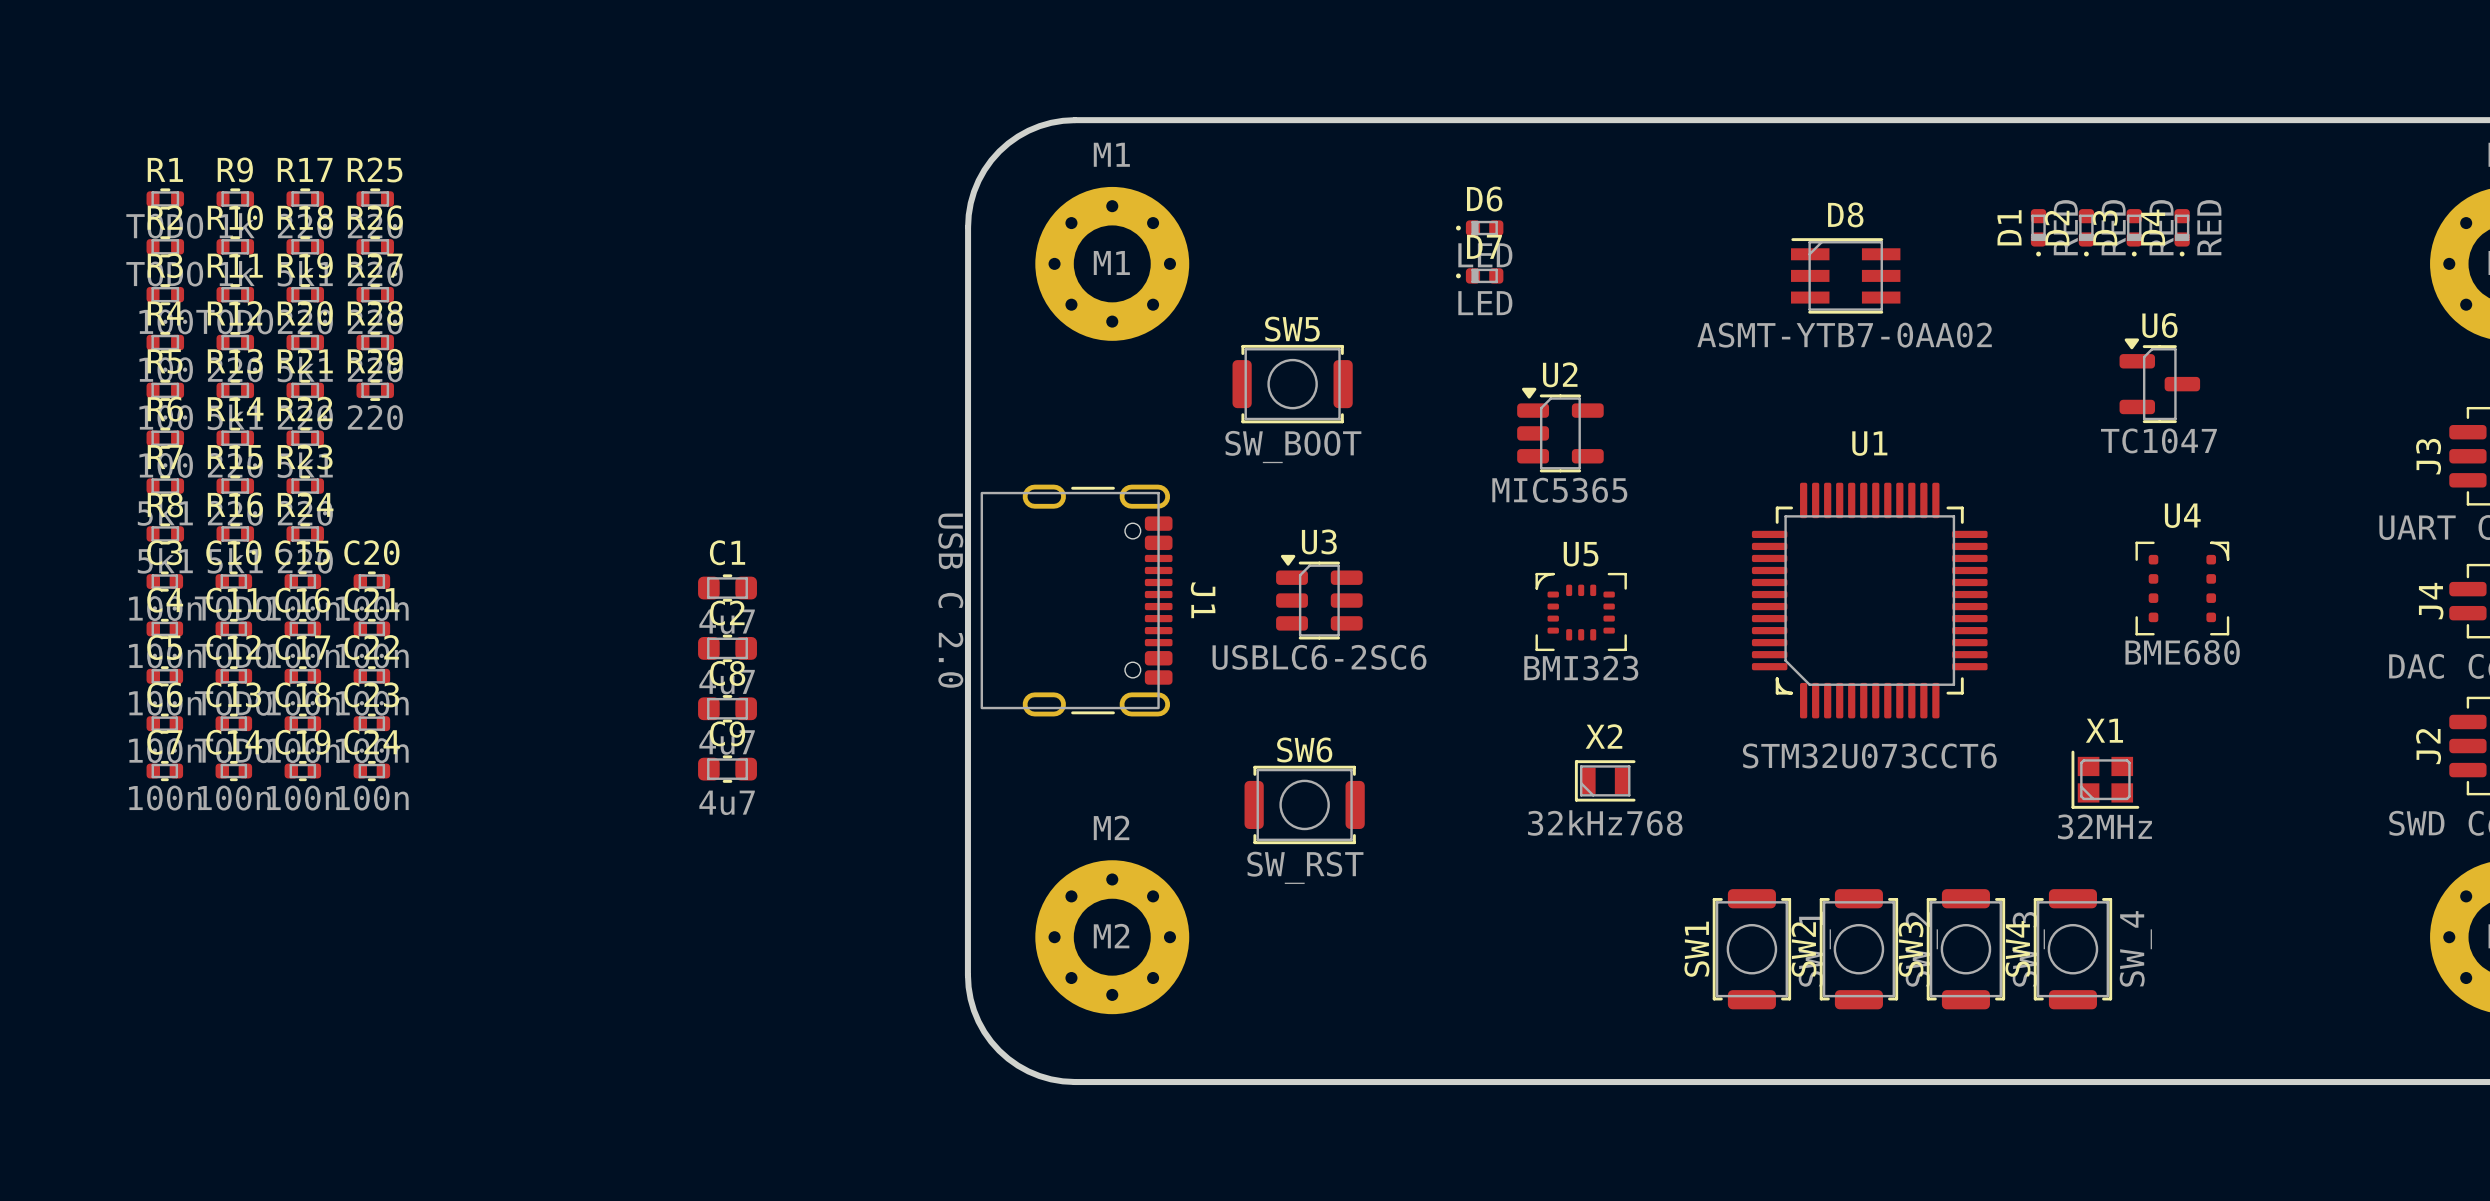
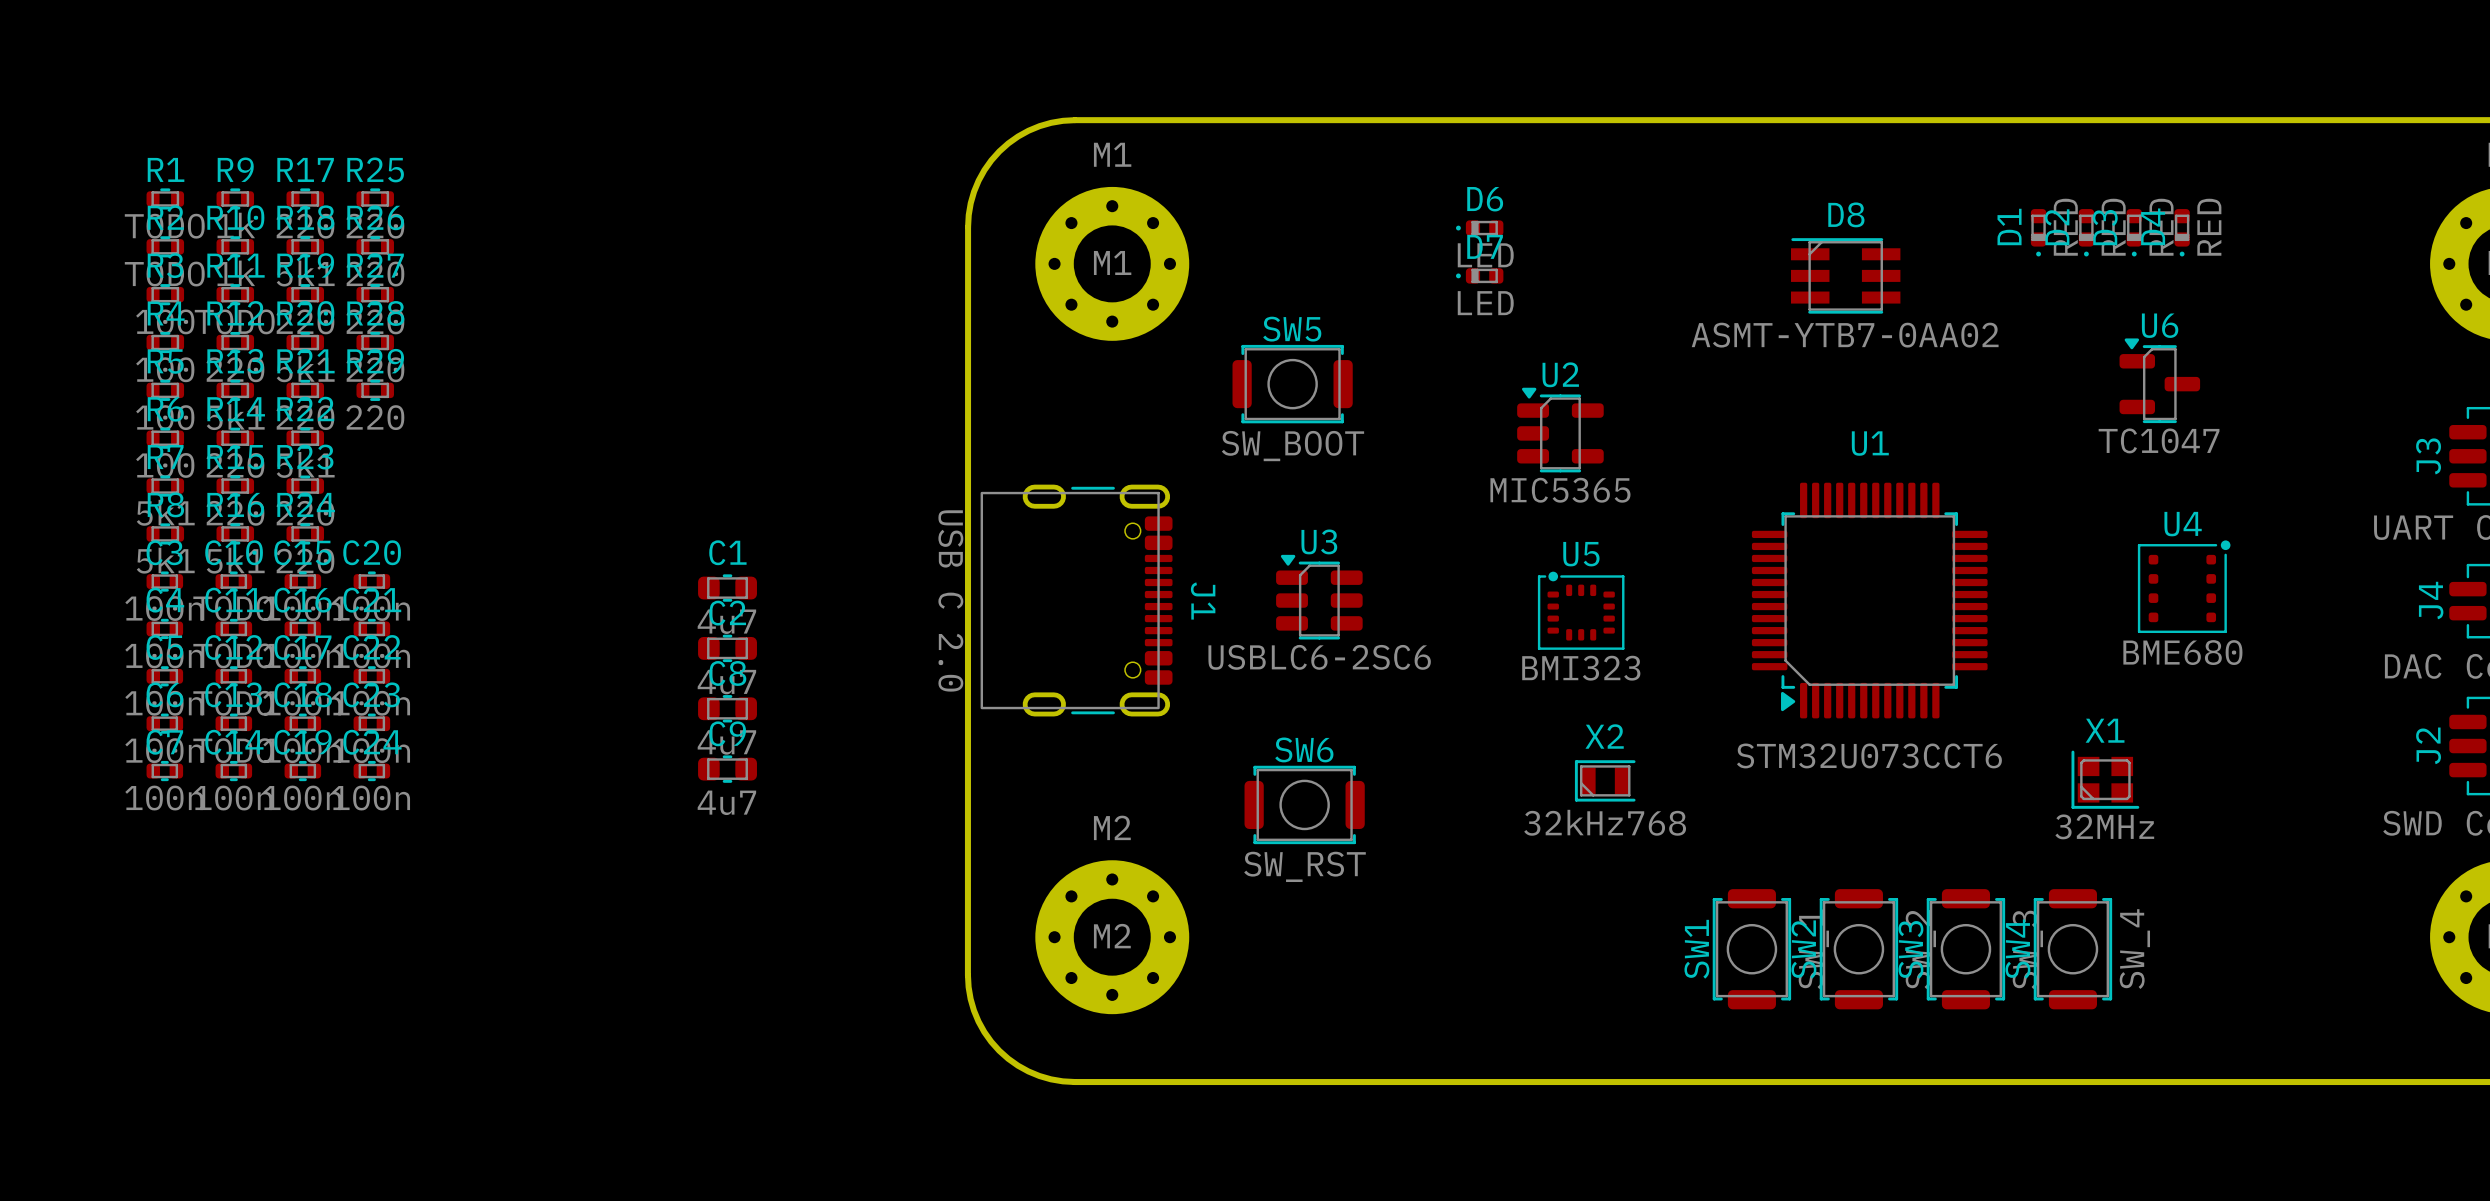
U1 footprint: [1751, 482, 1988, 719] -> [1751, 482, 1988, 719]
U4 footprint: [2135, 541, 2230, 636] -> [2137, 540, 2231, 634]
U5 footprint: [1535, 572, 1627, 652] -> [1537, 571, 1625, 650]

